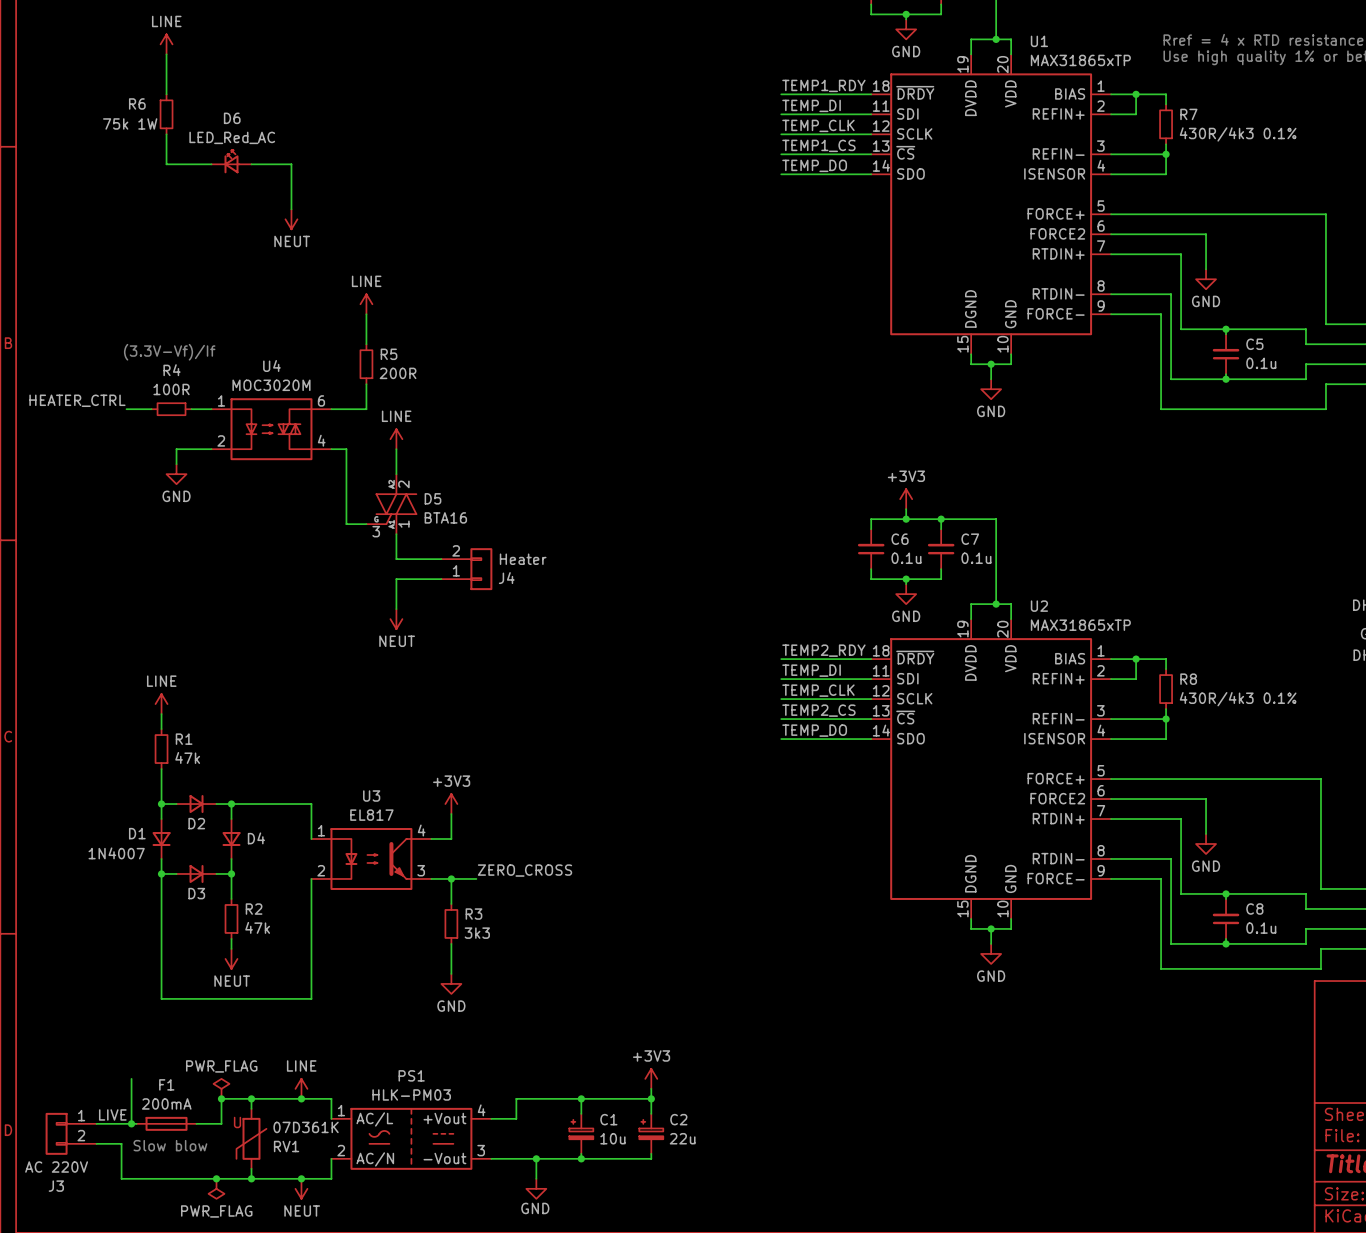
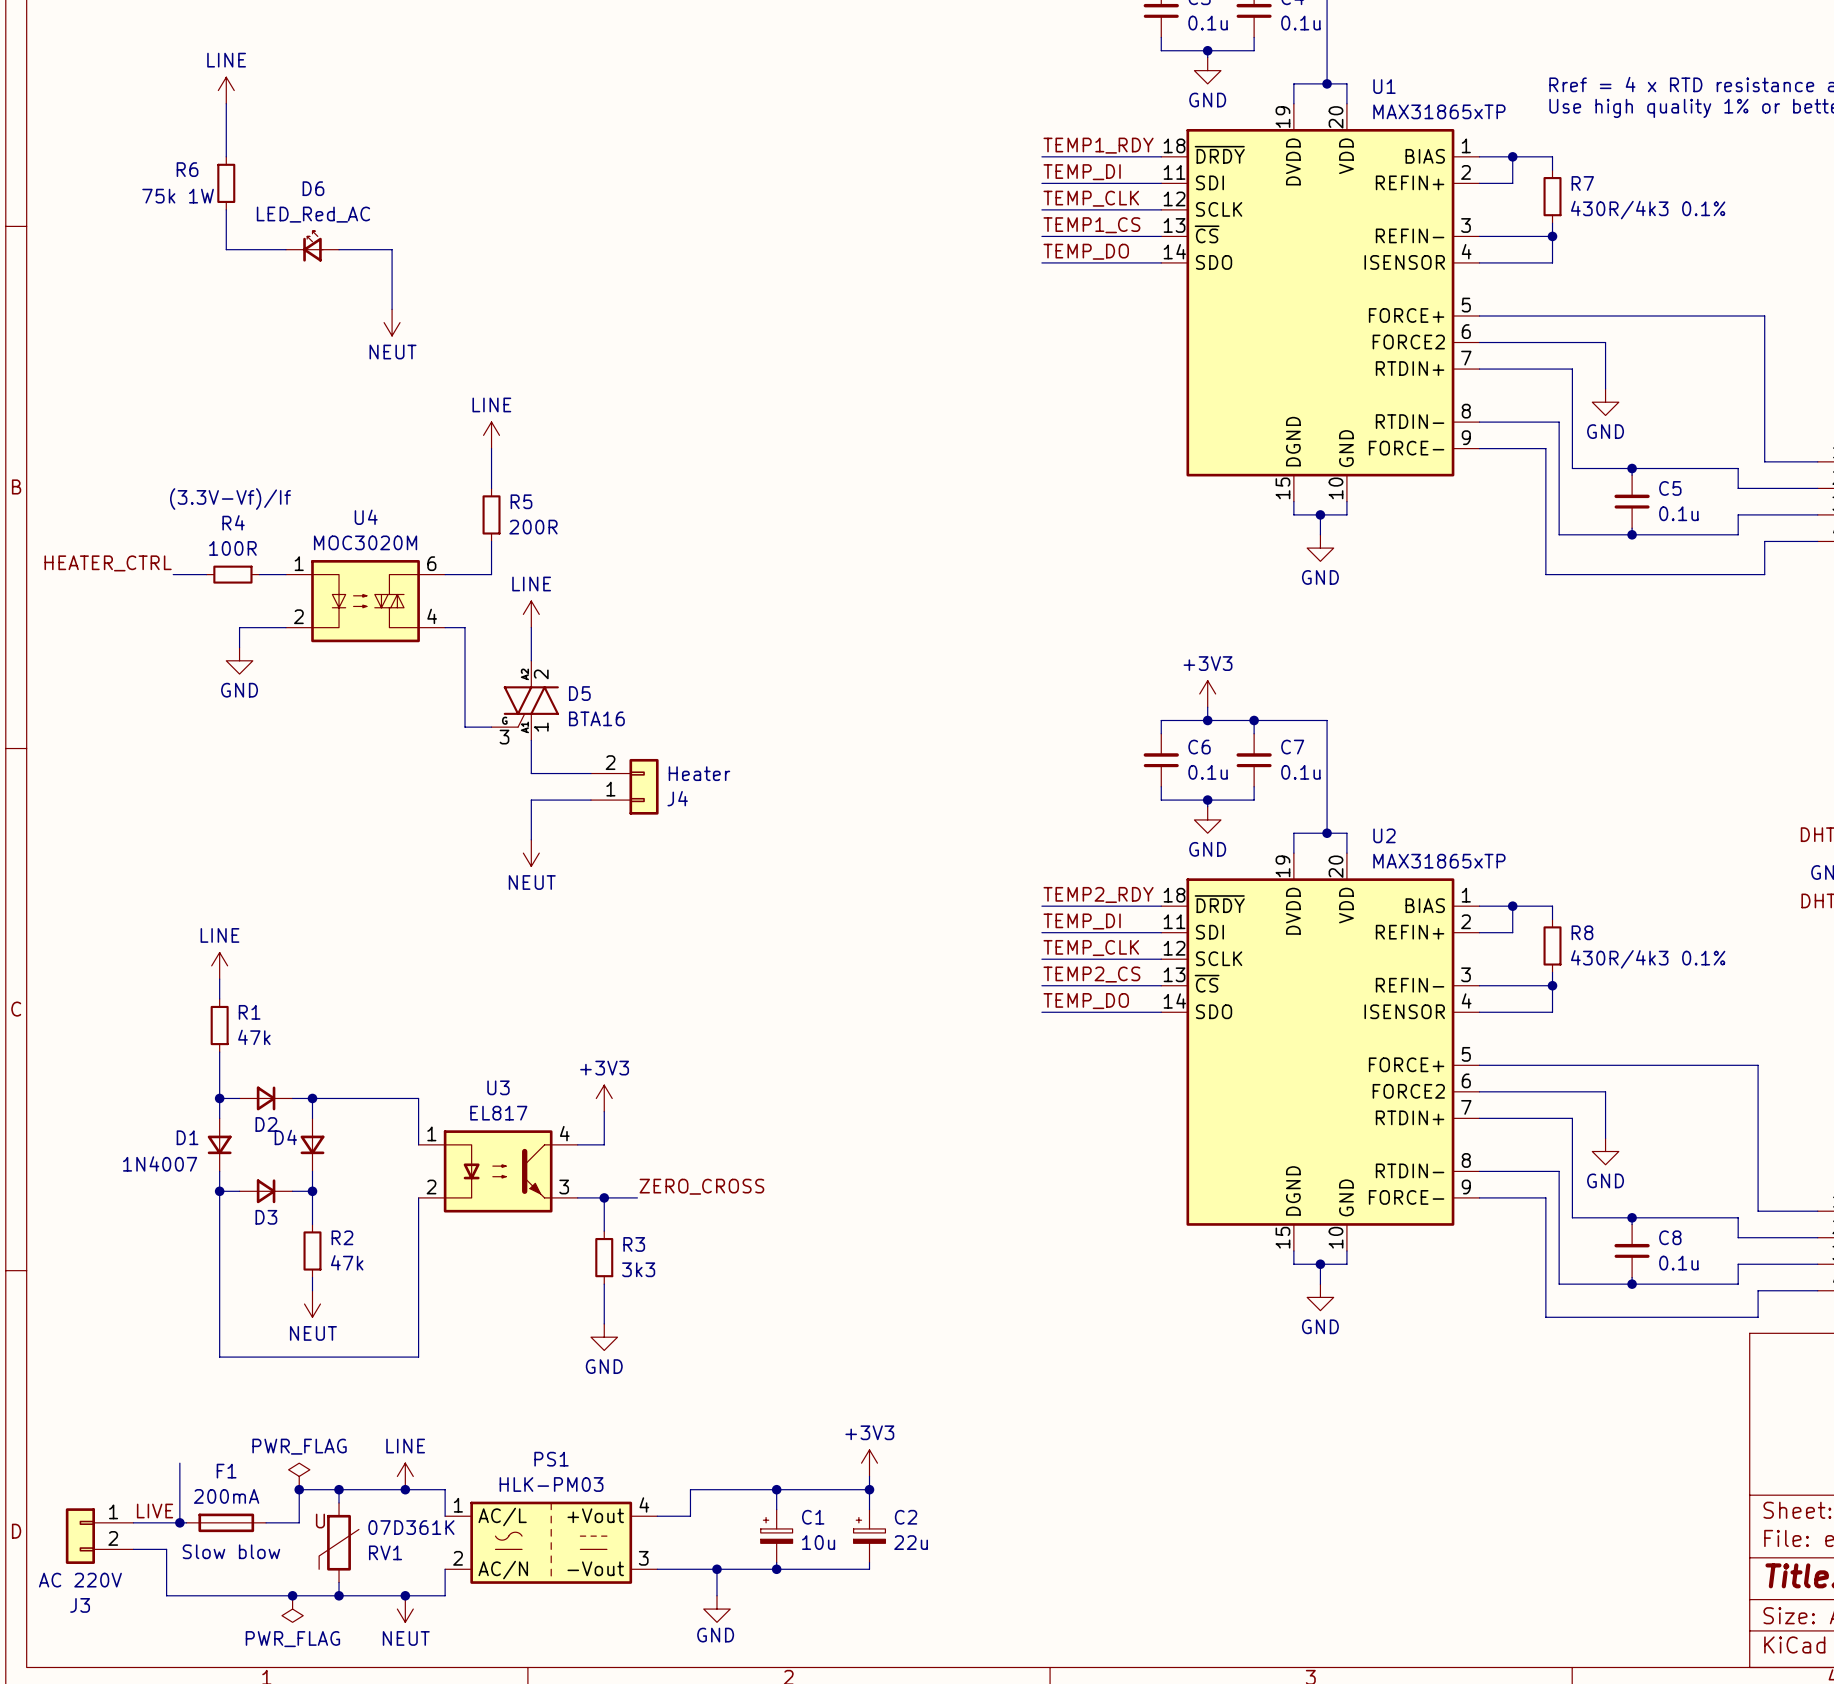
D4 name position: D4 (256, 838) -> D4 (285, 1137)

